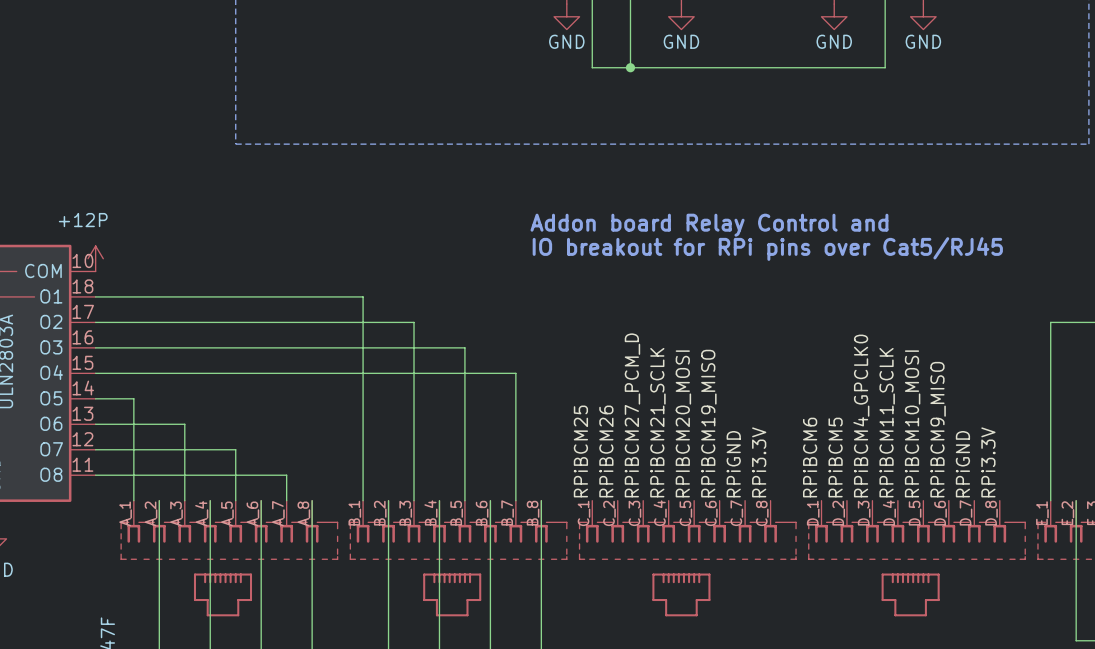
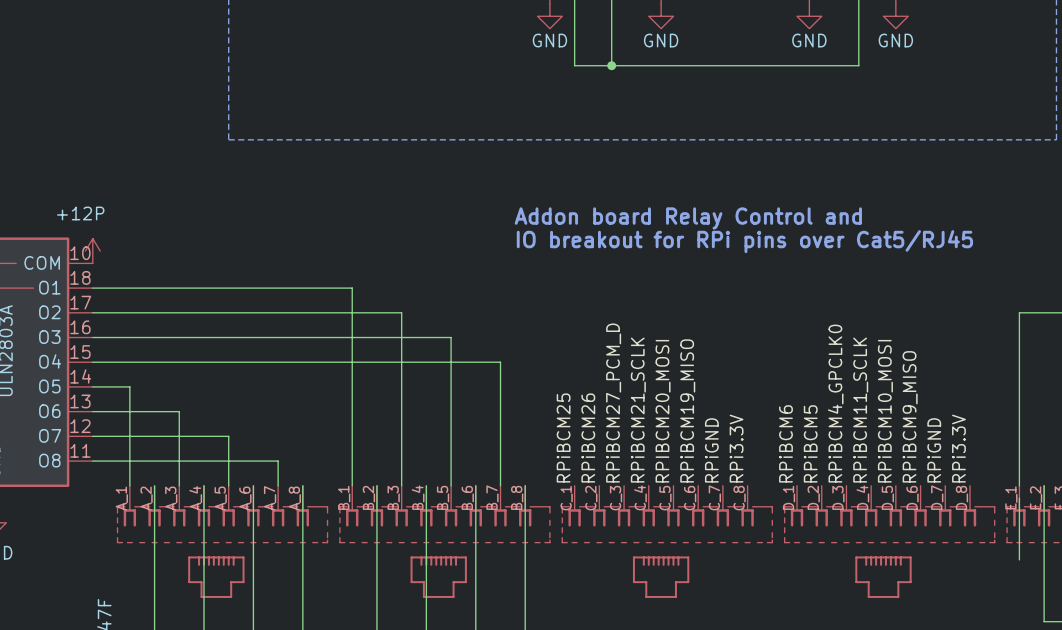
wire: none -> (1019, 498) (1019, 559)

